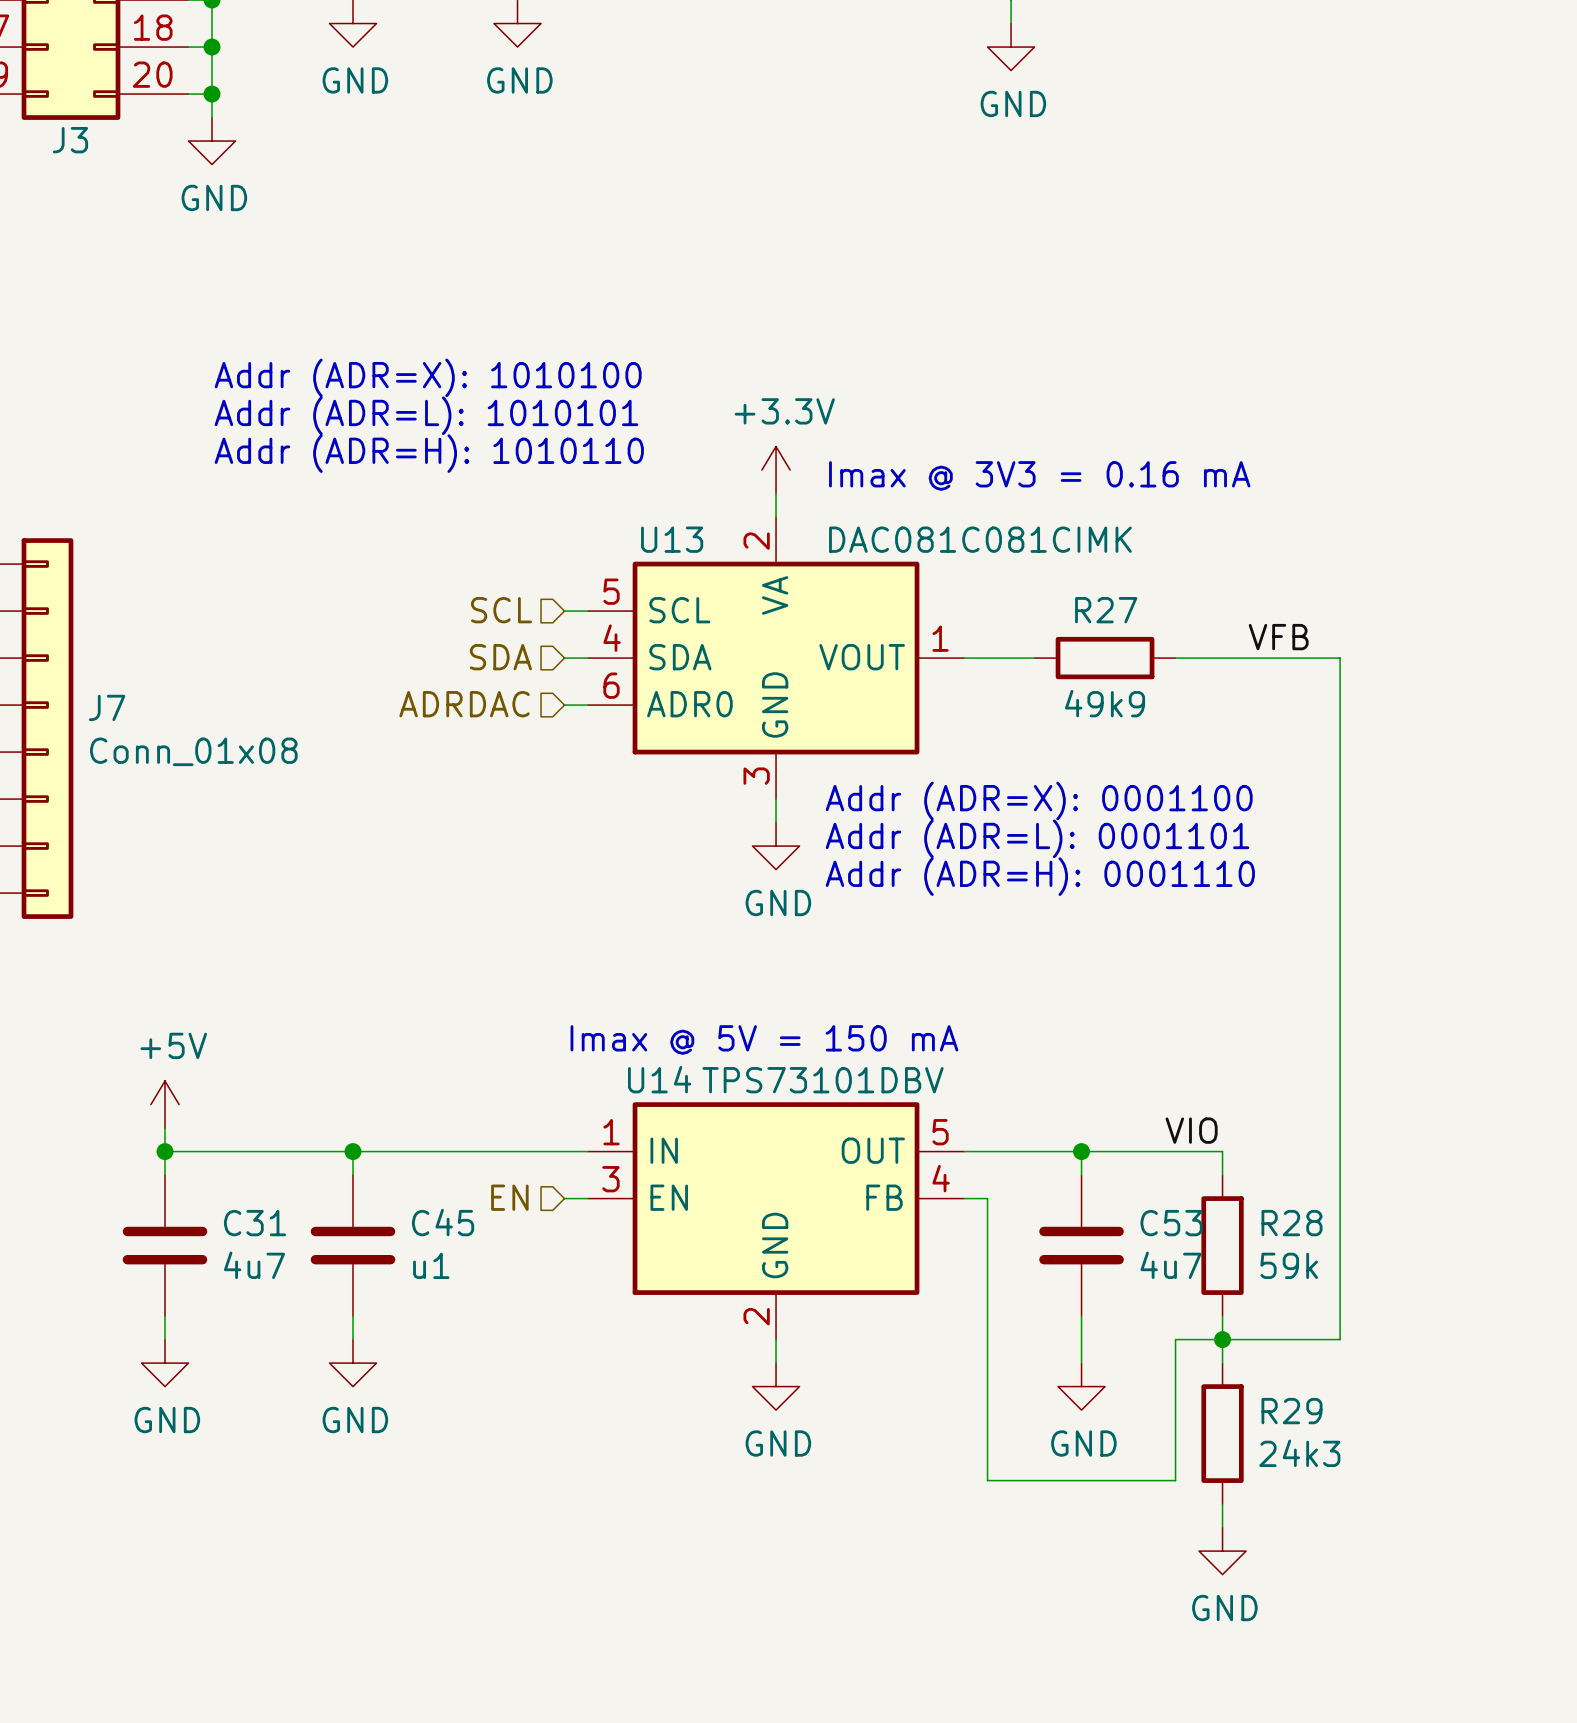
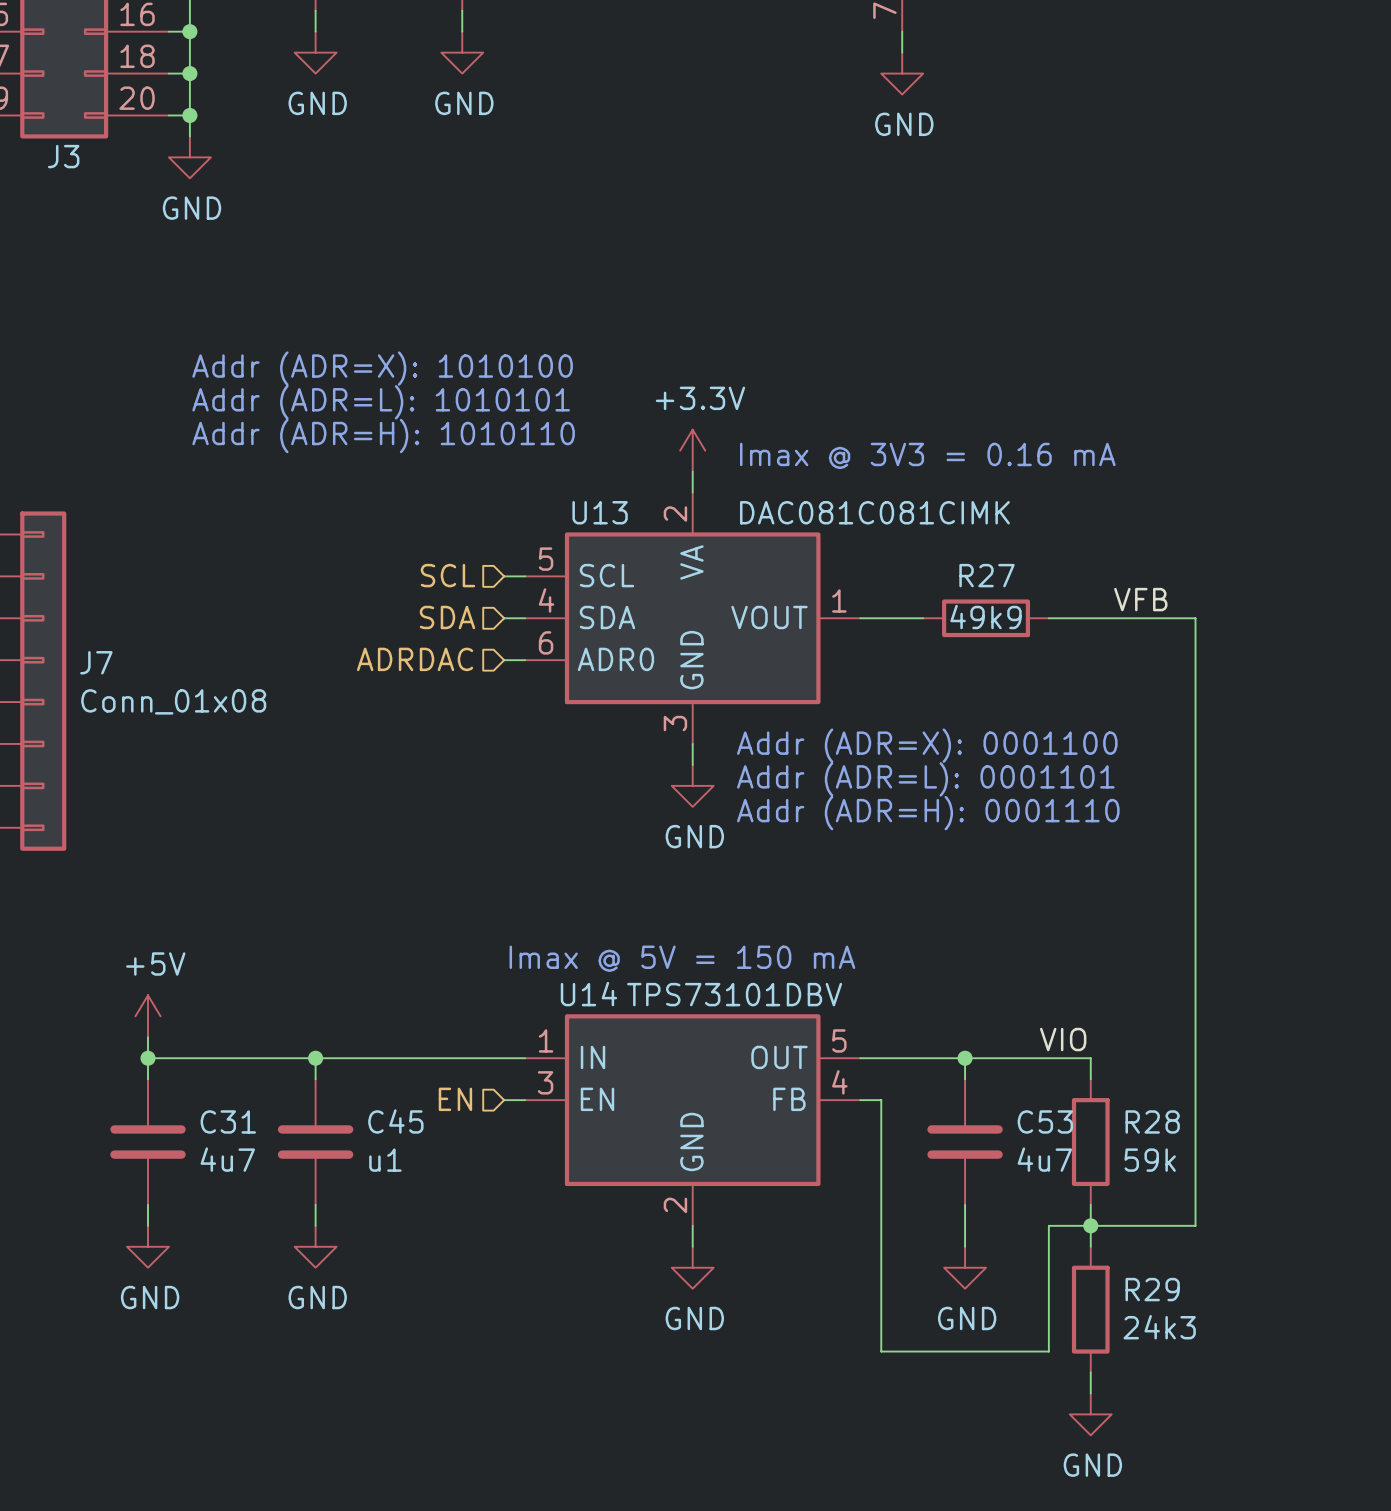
R27 value position: 49k9 (1105, 703) -> 49k9 (986, 617)

